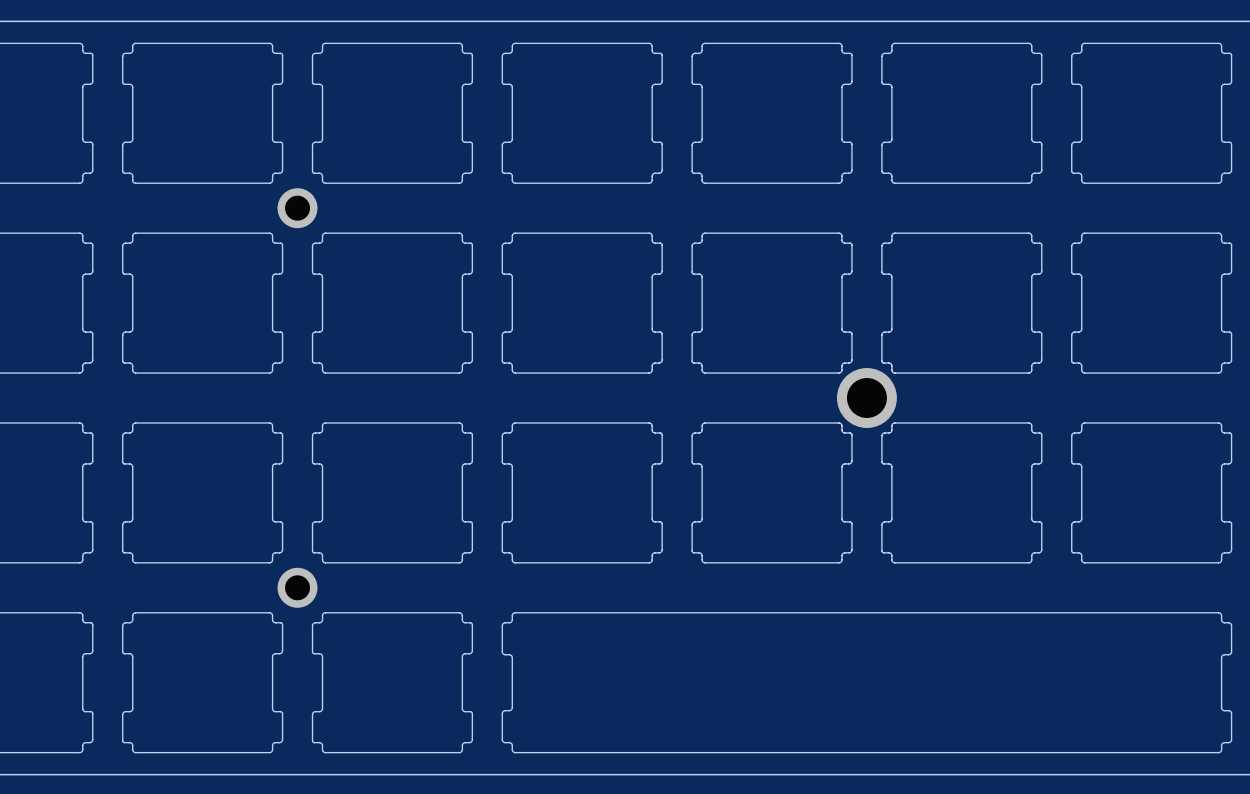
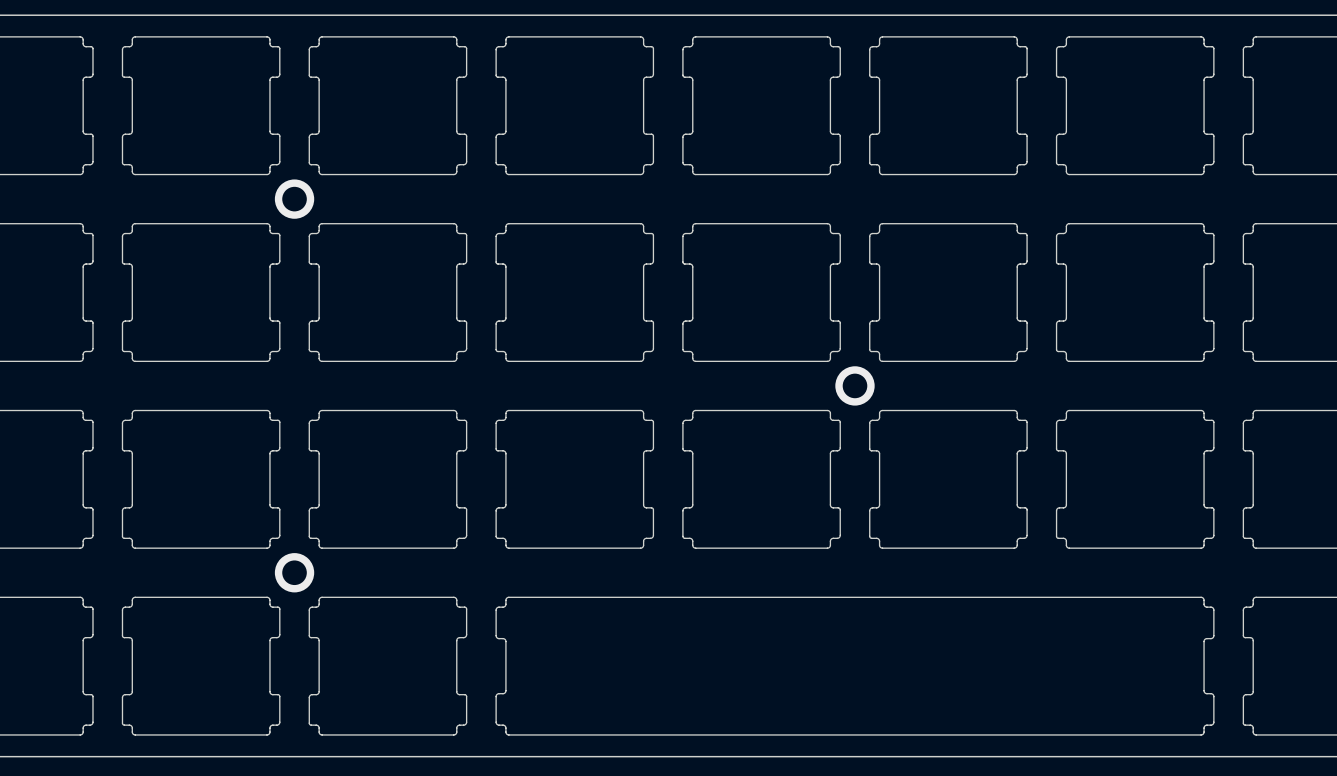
via size: [836, 368, 897, 428] -> [835, 366, 875, 406]

